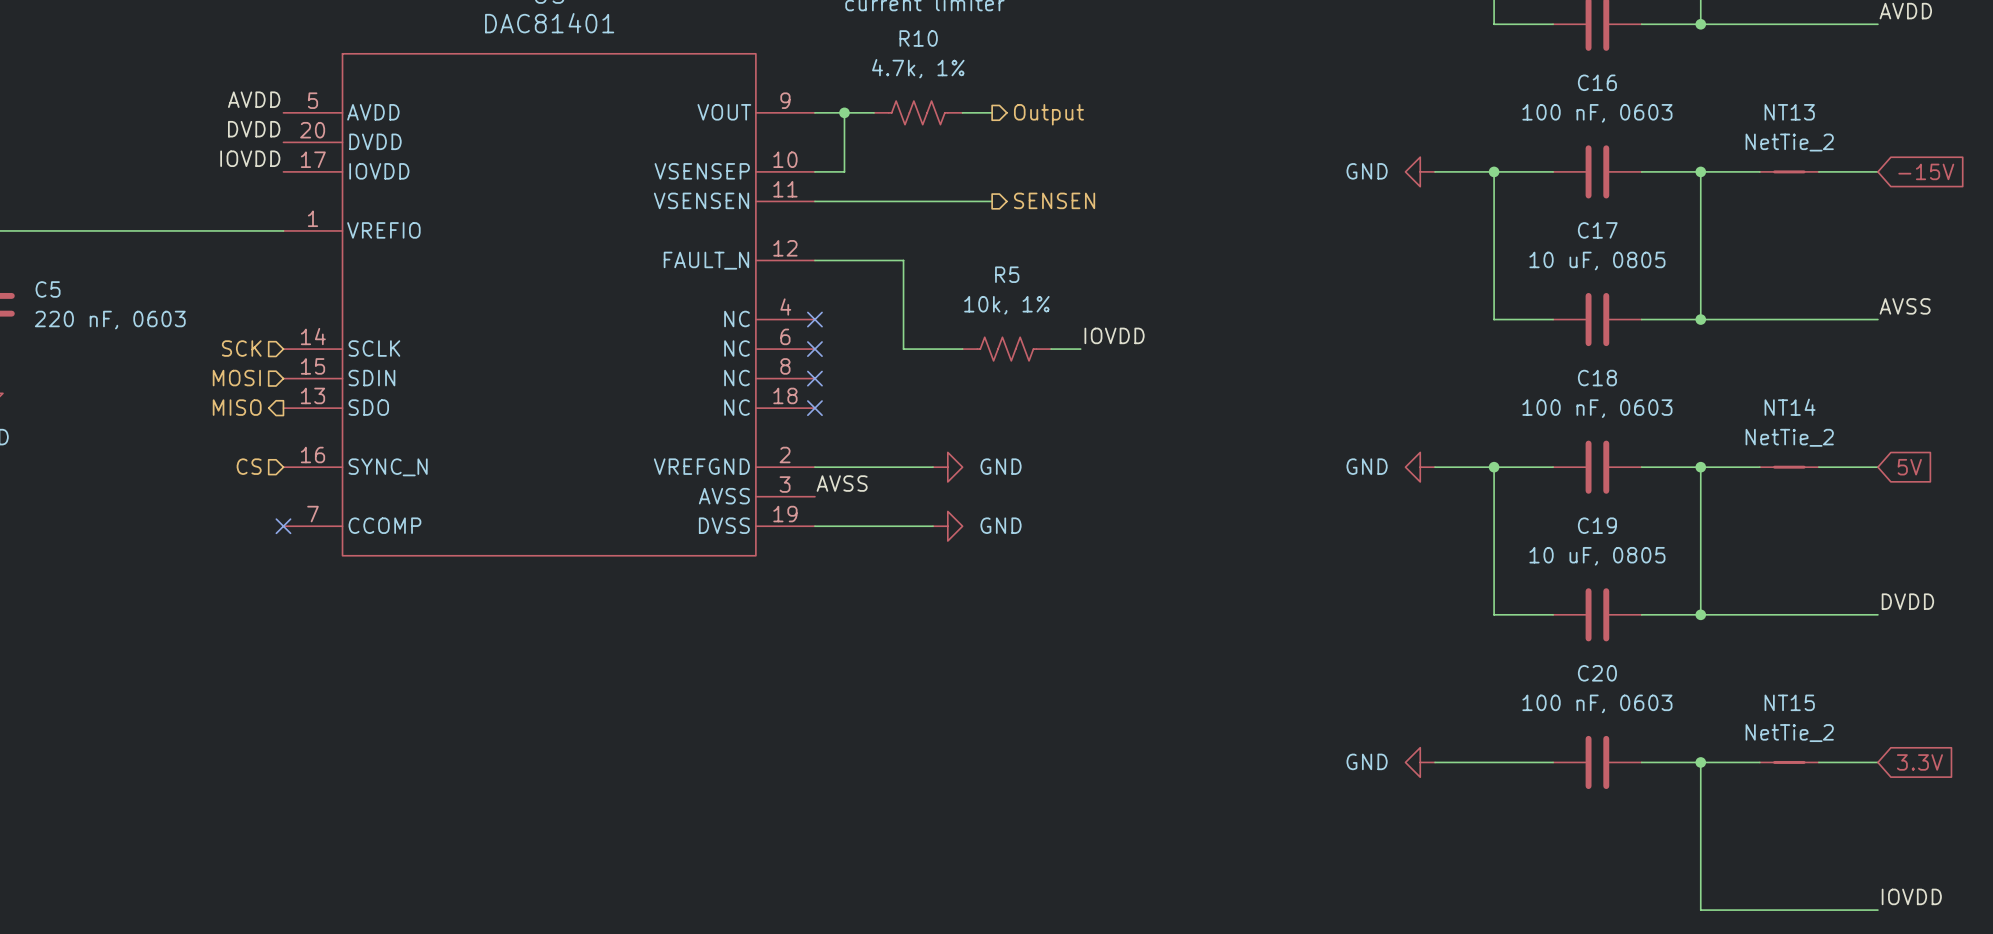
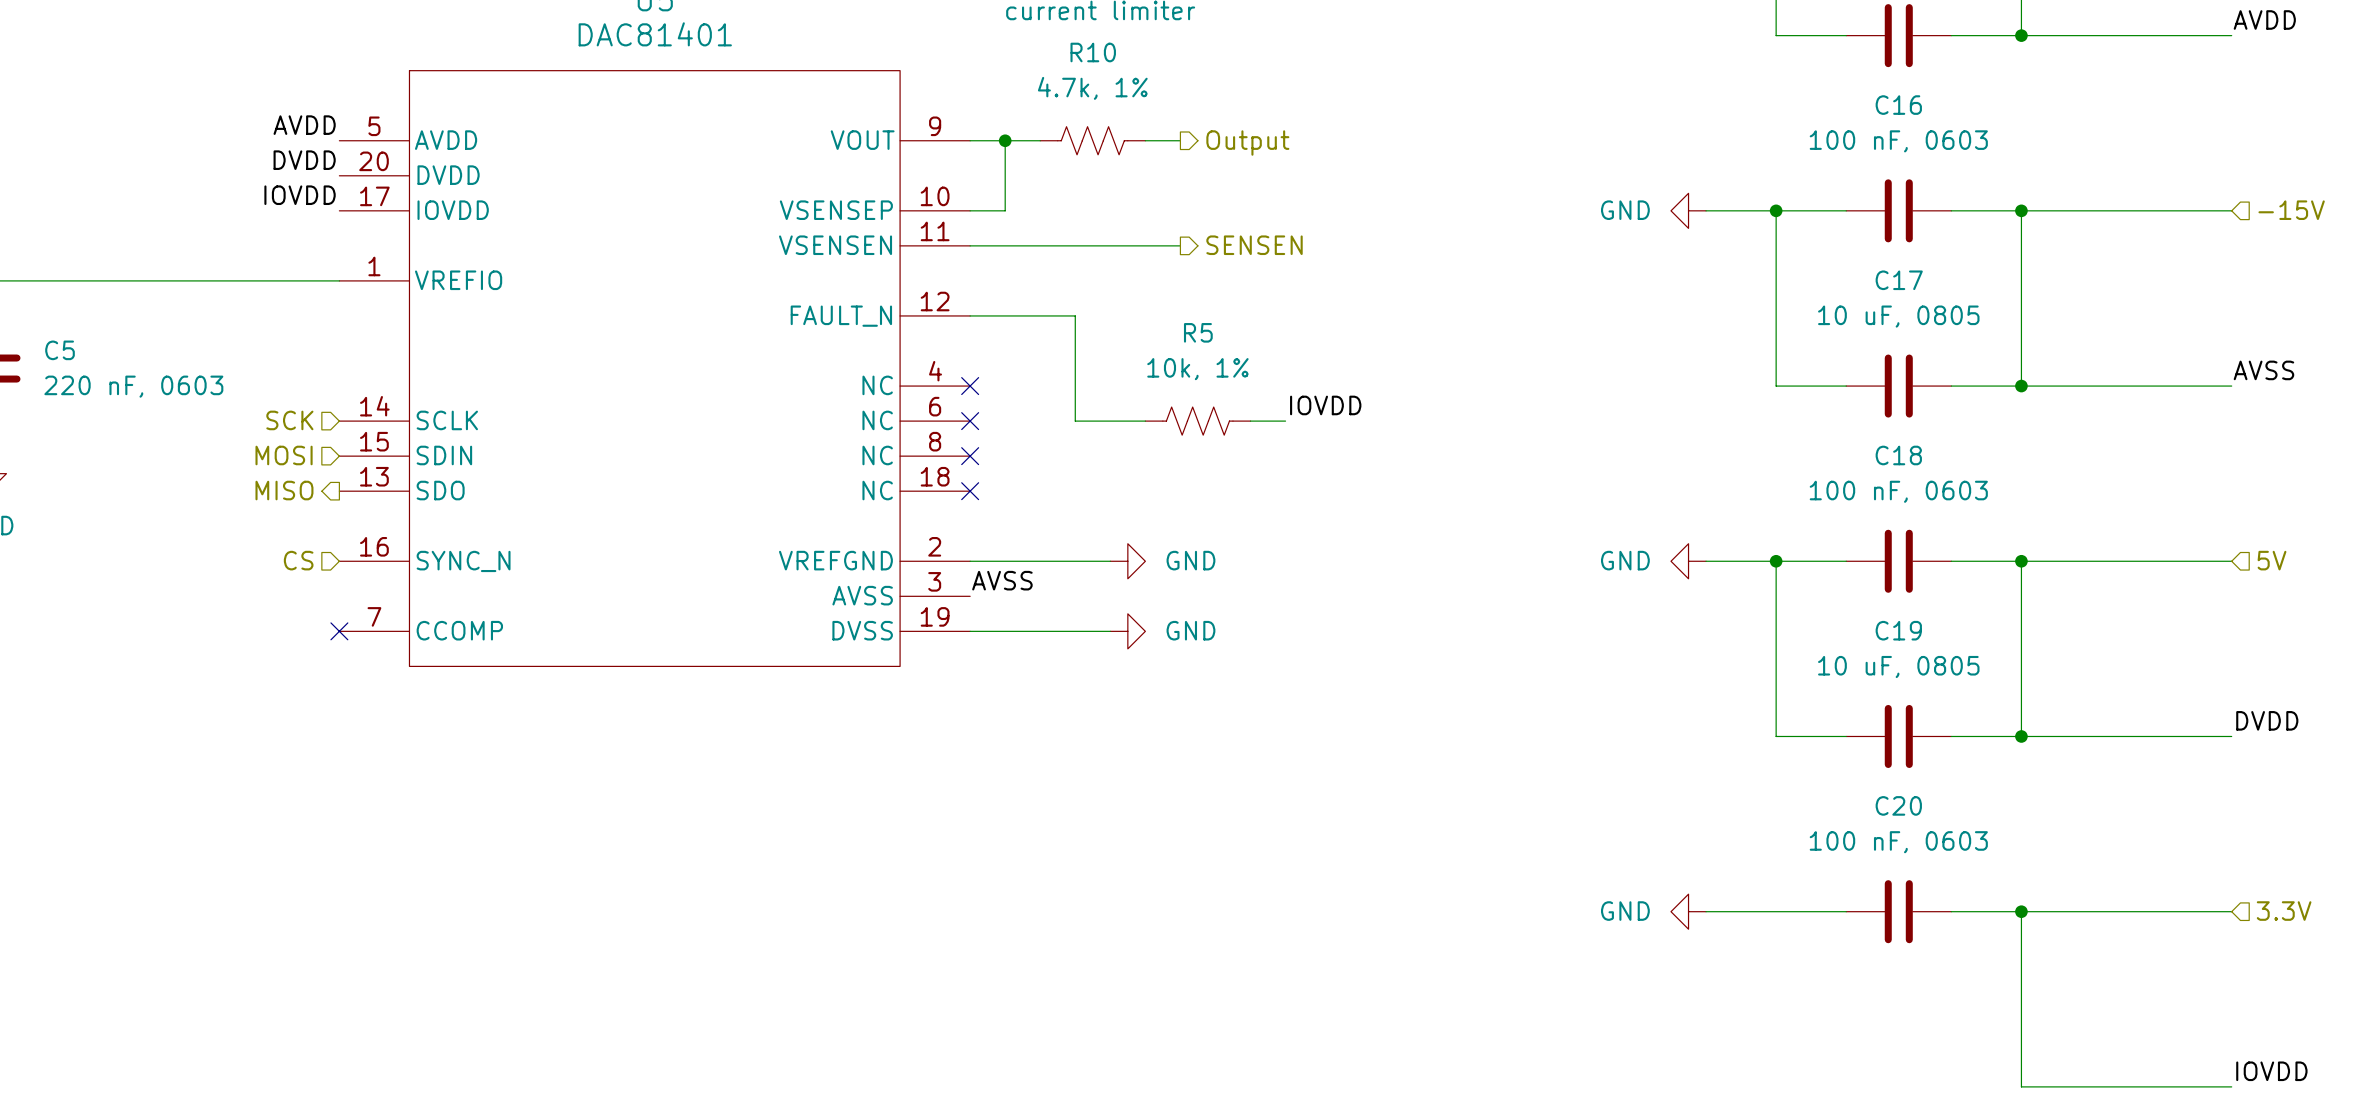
NT13: NetTie_2 (1789, 171) -> none
global label: -15V (1926, 171) -> none
hierarchical label: none -> -15V (2291, 210)
hierarchical label: none -> 5V (2272, 560)
NT14: NetTie_2 (1789, 467) -> none
global label: 5V (1909, 467) -> none
hierarchical label: none -> 3.3V (2284, 911)
NT15: NetTie_2 (1789, 762) -> none
global label: 3.3V (1919, 762) -> none

